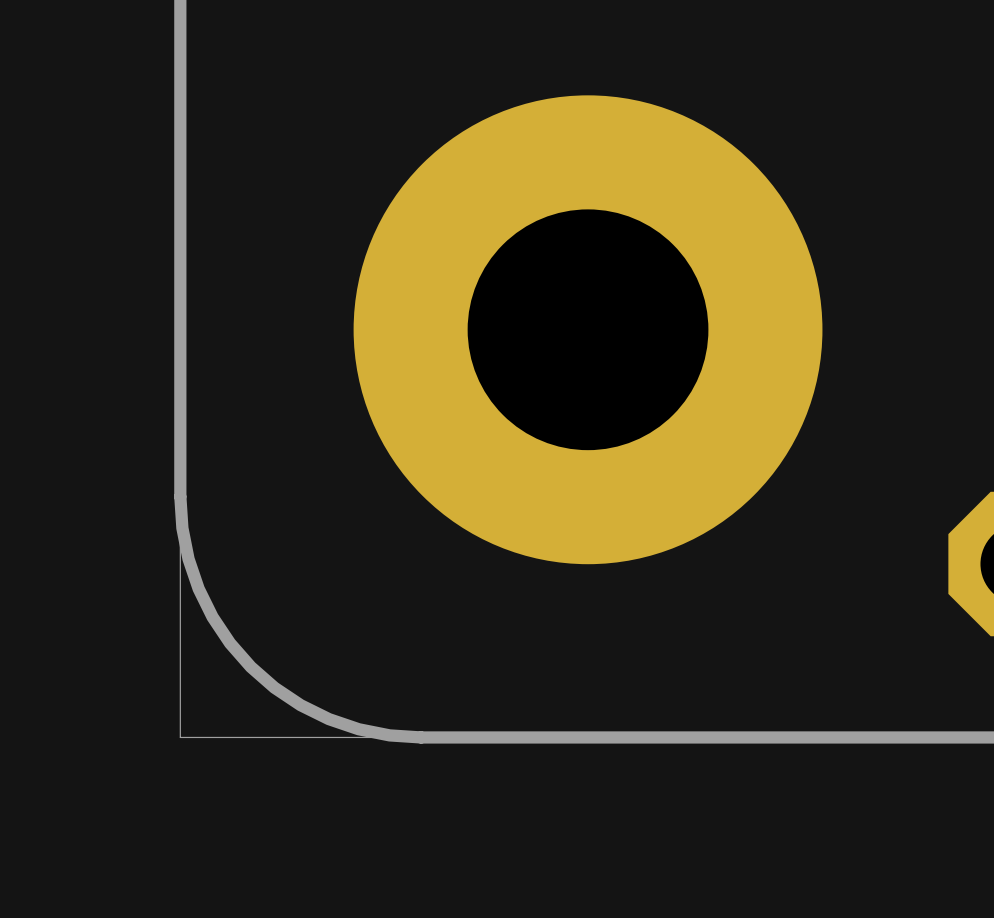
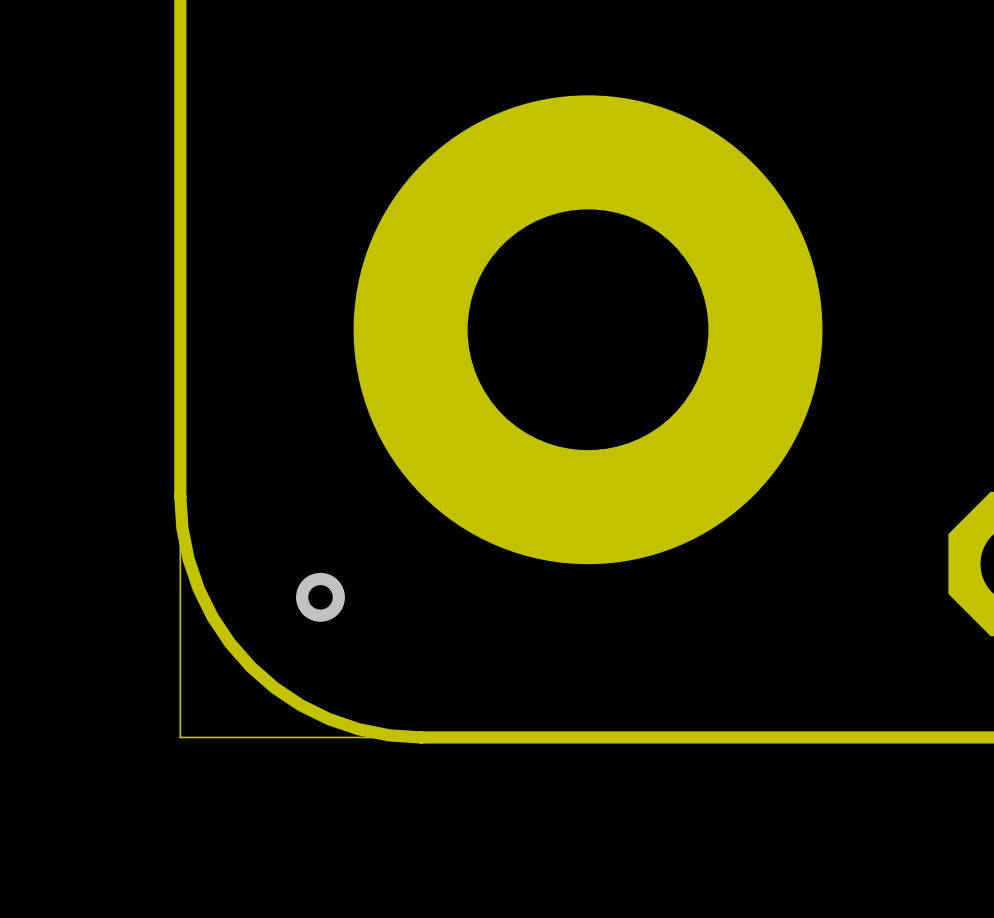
via: none -> (320, 597)

